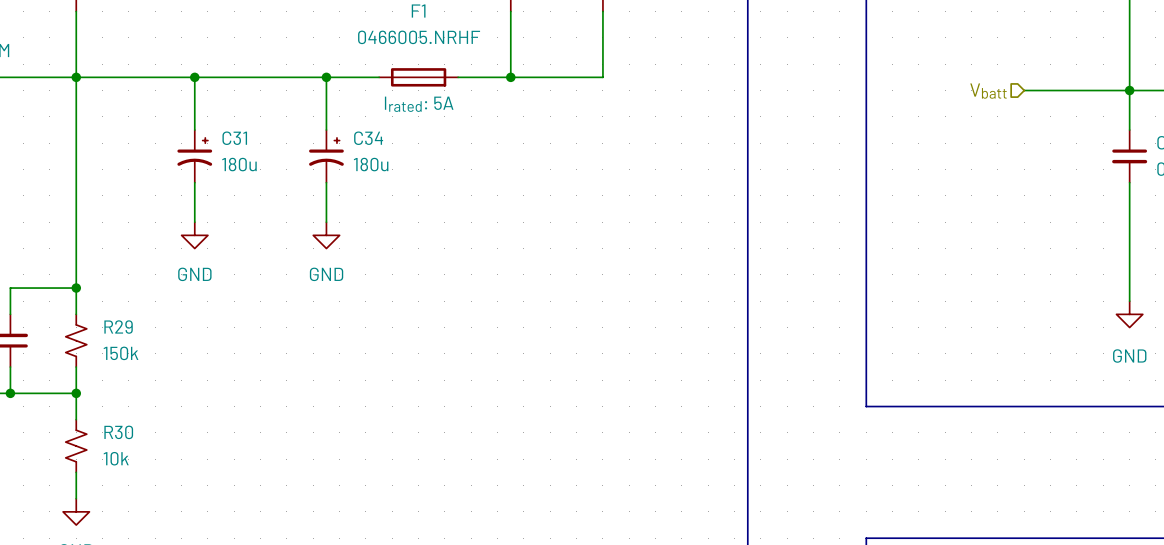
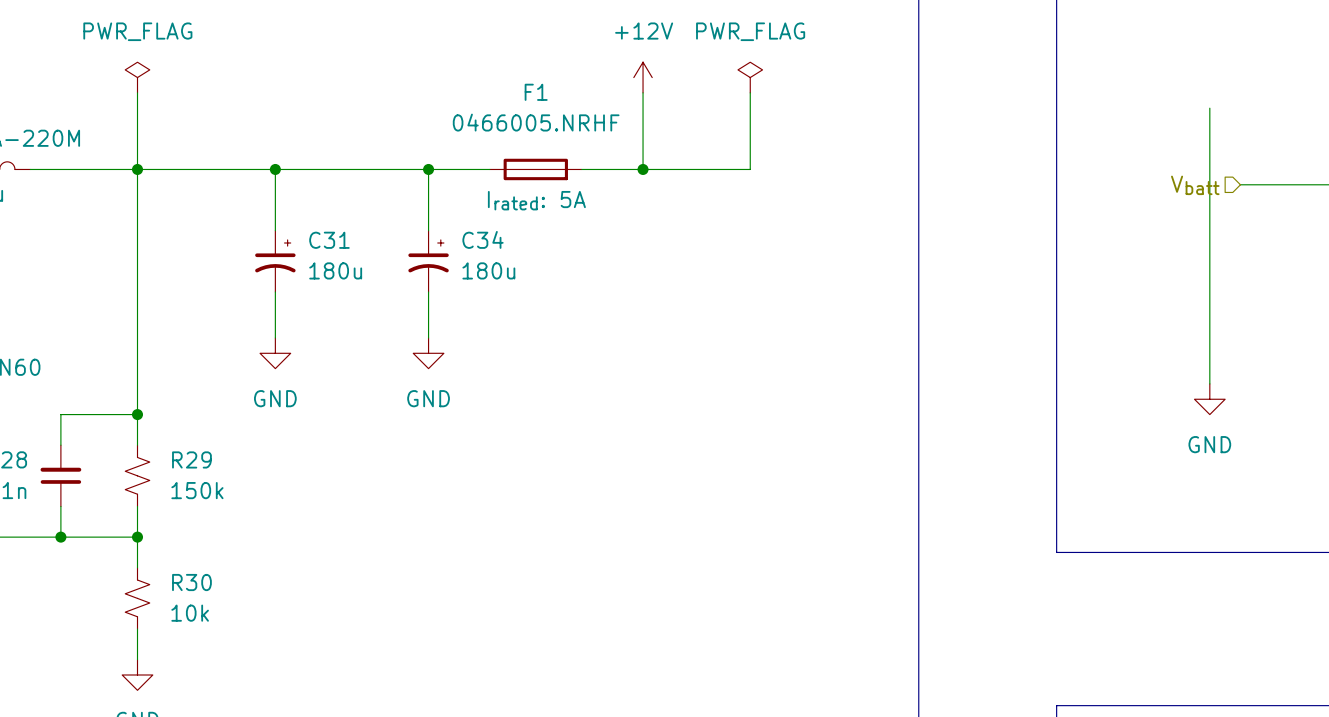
wire: none -> (1209, 108) (1209, 383)
power symbol: none -> GND (1209, 399)

